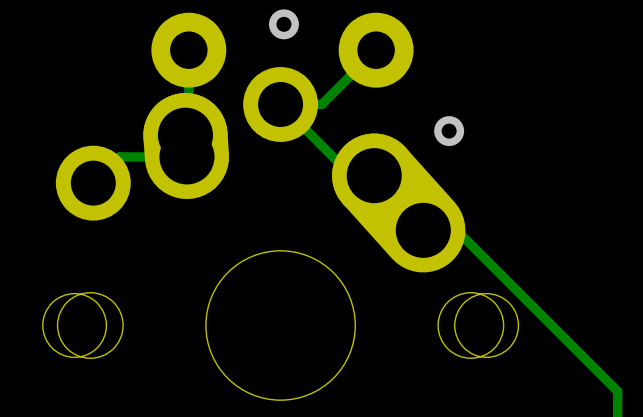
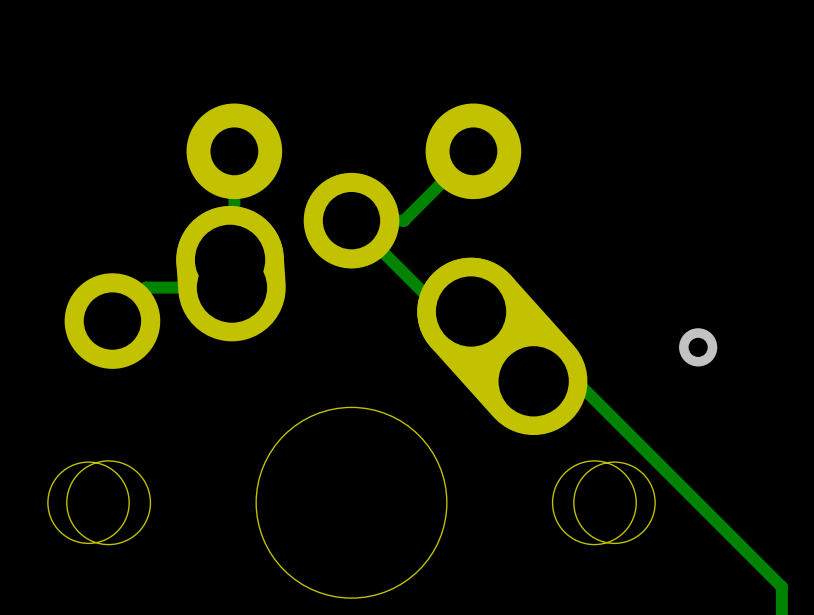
via: (283, 24) -> none
via: (449, 131) -> none
via: none -> (698, 347)

